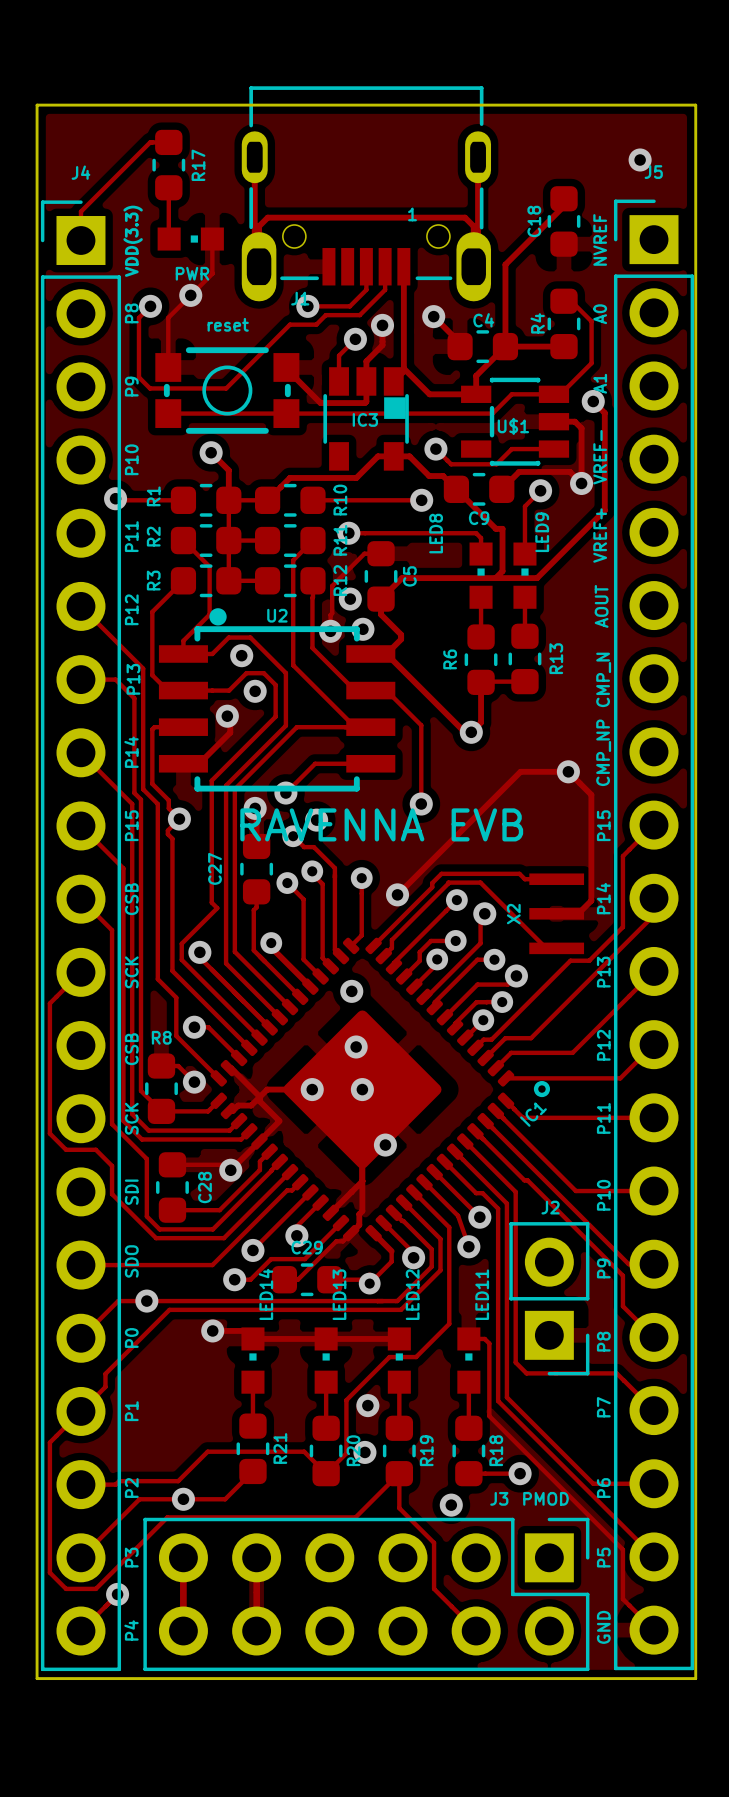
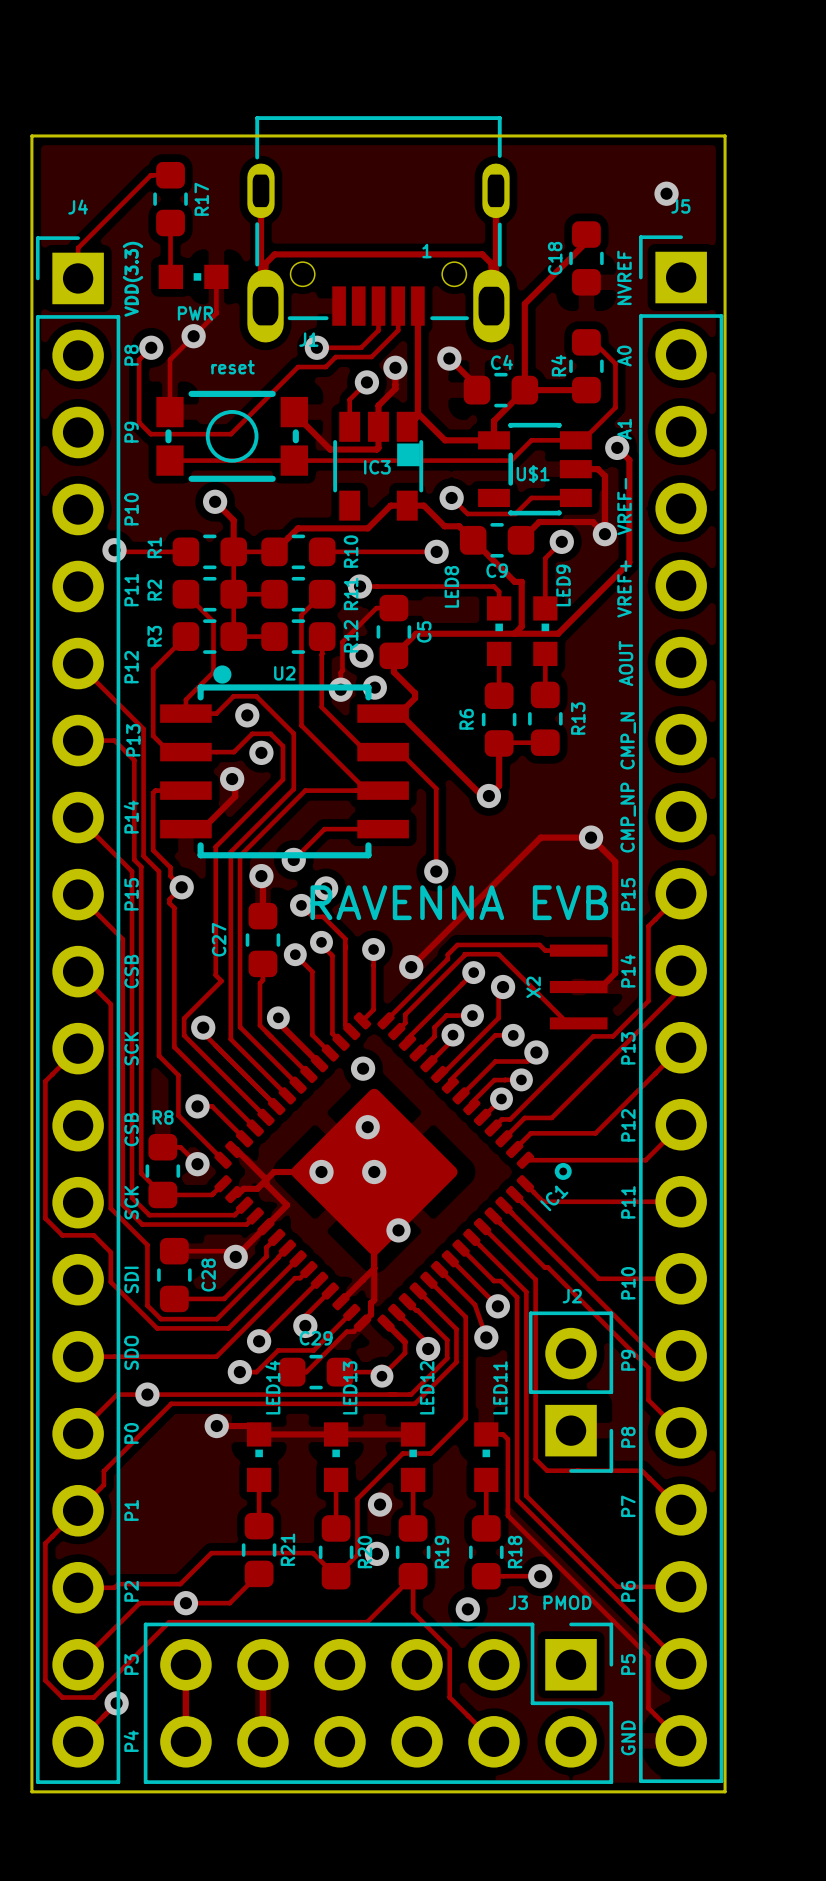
text position: RAVENNA EVB (381, 824) -> RAVENNA EVB (459, 902)

